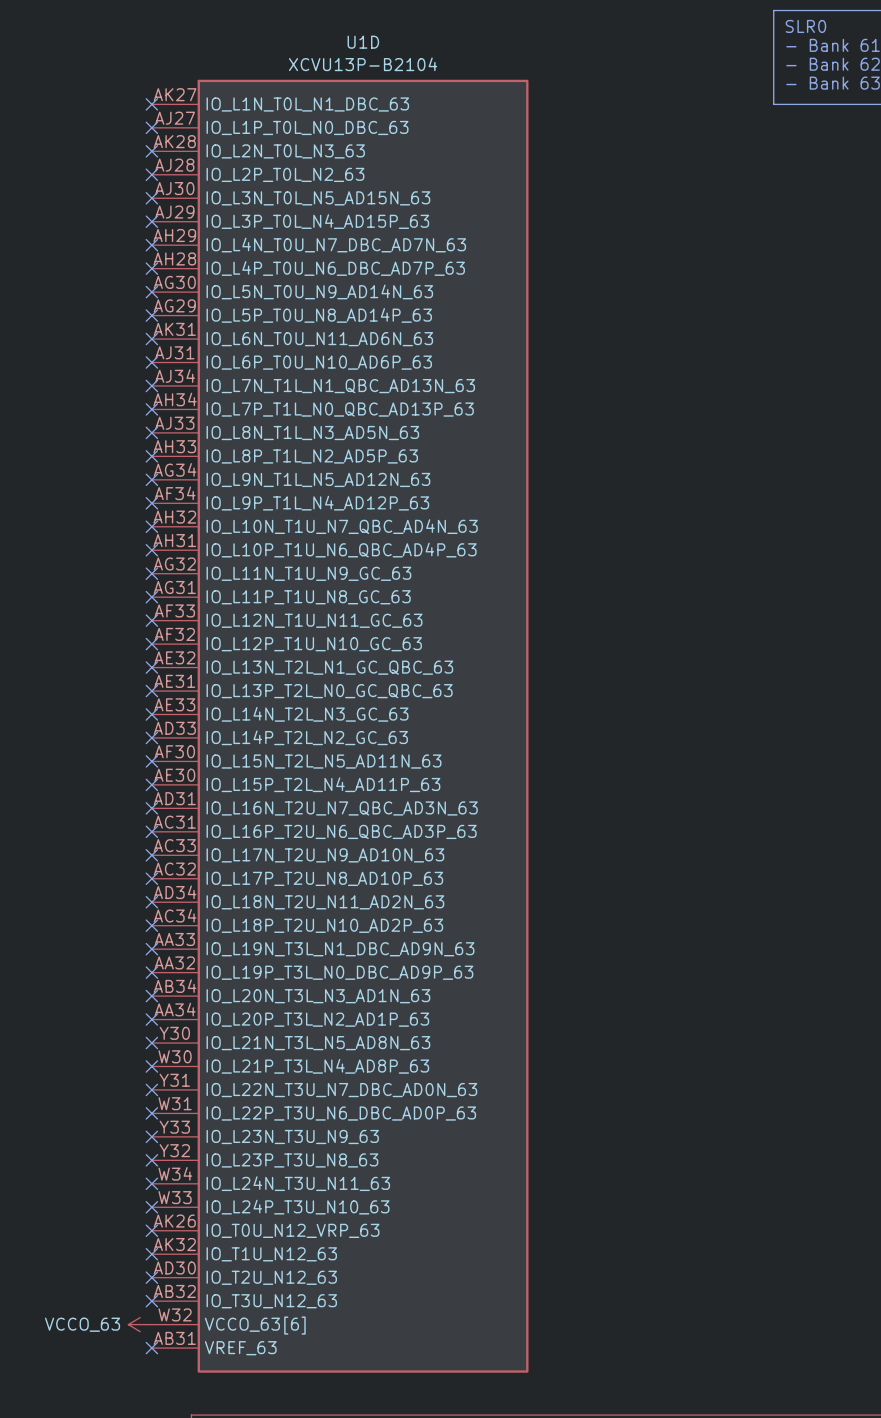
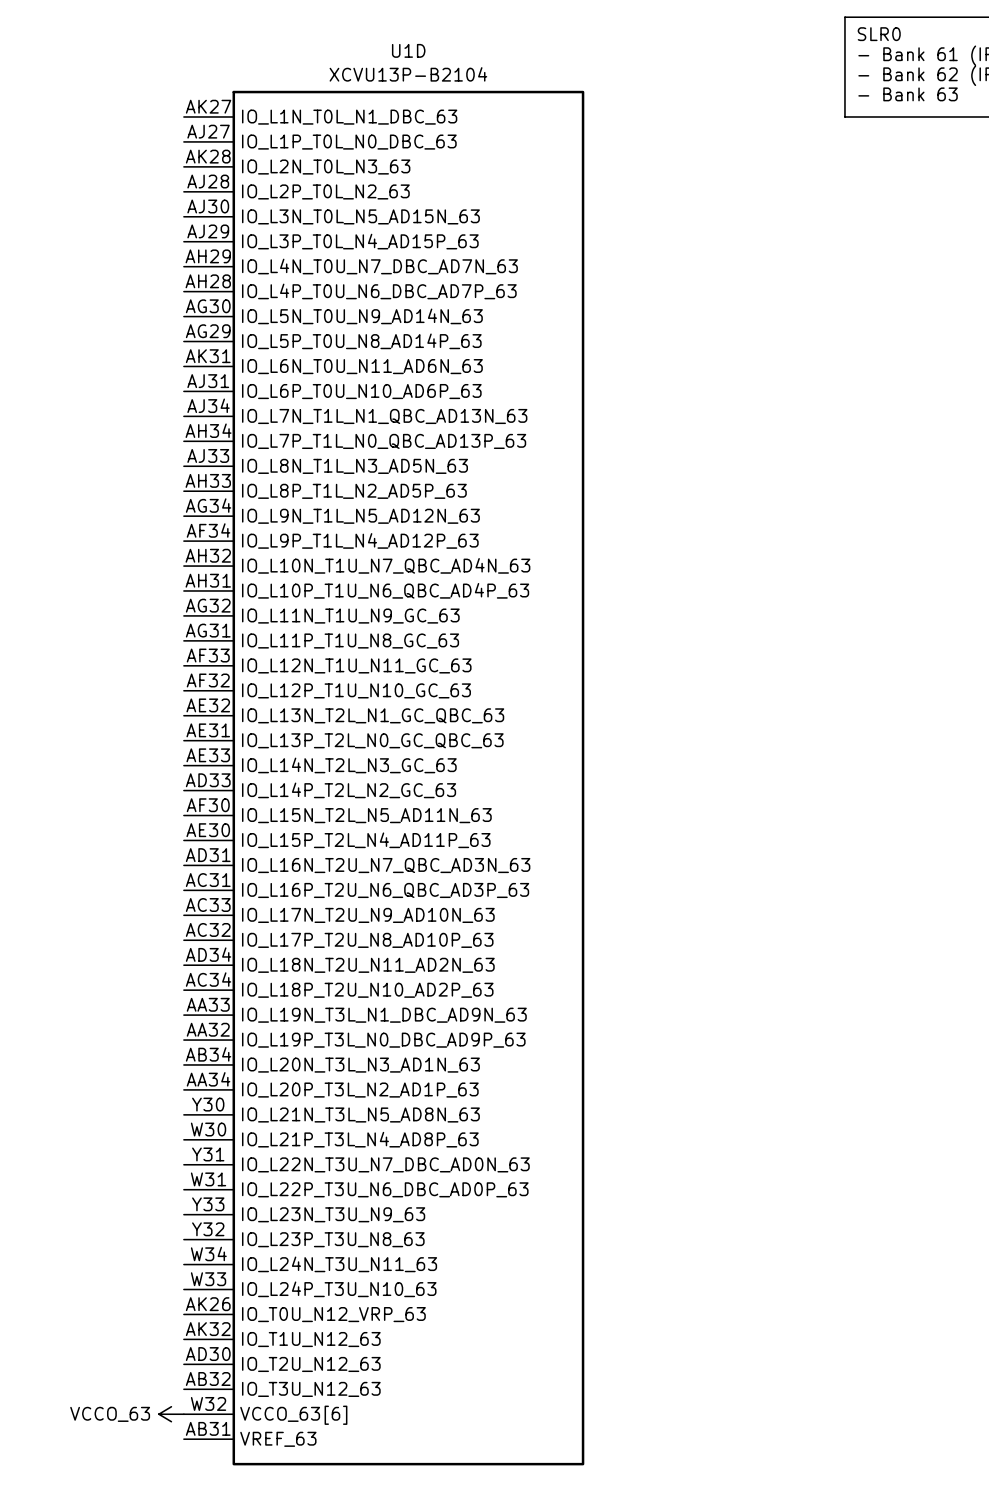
no-connect mark: (151, 104) -> none
no-connect mark: (151, 127) -> none
no-connect mark: (151, 151) -> none
no-connect mark: (151, 174) -> none
no-connect mark: (151, 198) -> none
no-connect mark: (151, 221) -> none
no-connect mark: (151, 245) -> none
no-connect mark: (151, 268) -> none
no-connect mark: (151, 292) -> none
no-connect mark: (151, 315) -> none
no-connect mark: (151, 339) -> none
no-connect mark: (151, 362) -> none
no-connect mark: (151, 385) -> none
no-connect mark: (151, 409) -> none
no-connect mark: (151, 432) -> none
no-connect mark: (151, 456) -> none
no-connect mark: (151, 479) -> none
no-connect mark: (151, 503) -> none
no-connect mark: (151, 526) -> none
no-connect mark: (151, 550) -> none
no-connect mark: (151, 573) -> none
no-connect mark: (151, 597) -> none
no-connect mark: (151, 620) -> none
no-connect mark: (151, 644) -> none
no-connect mark: (151, 667) -> none
no-connect mark: (151, 691) -> none
no-connect mark: (151, 714) -> none
no-connect mark: (151, 737) -> none
no-connect mark: (151, 761) -> none
no-connect mark: (151, 784) -> none
no-connect mark: (151, 808) -> none
no-connect mark: (151, 831) -> none
no-connect mark: (151, 855) -> none
no-connect mark: (151, 878) -> none
no-connect mark: (151, 902) -> none
no-connect mark: (151, 925) -> none
no-connect mark: (151, 949) -> none
no-connect mark: (151, 972) -> none
no-connect mark: (151, 996) -> none
no-connect mark: (151, 1019) -> none
no-connect mark: (151, 1043) -> none
no-connect mark: (151, 1066) -> none
no-connect mark: (151, 1089) -> none
no-connect mark: (151, 1113) -> none
no-connect mark: (151, 1136) -> none
no-connect mark: (151, 1160) -> none
no-connect mark: (151, 1183) -> none
no-connect mark: (151, 1207) -> none
no-connect mark: (151, 1230) -> none
no-connect mark: (151, 1254) -> none
no-connect mark: (151, 1277) -> none
no-connect mark: (151, 1301) -> none
no-connect mark: (151, 1348) -> none

